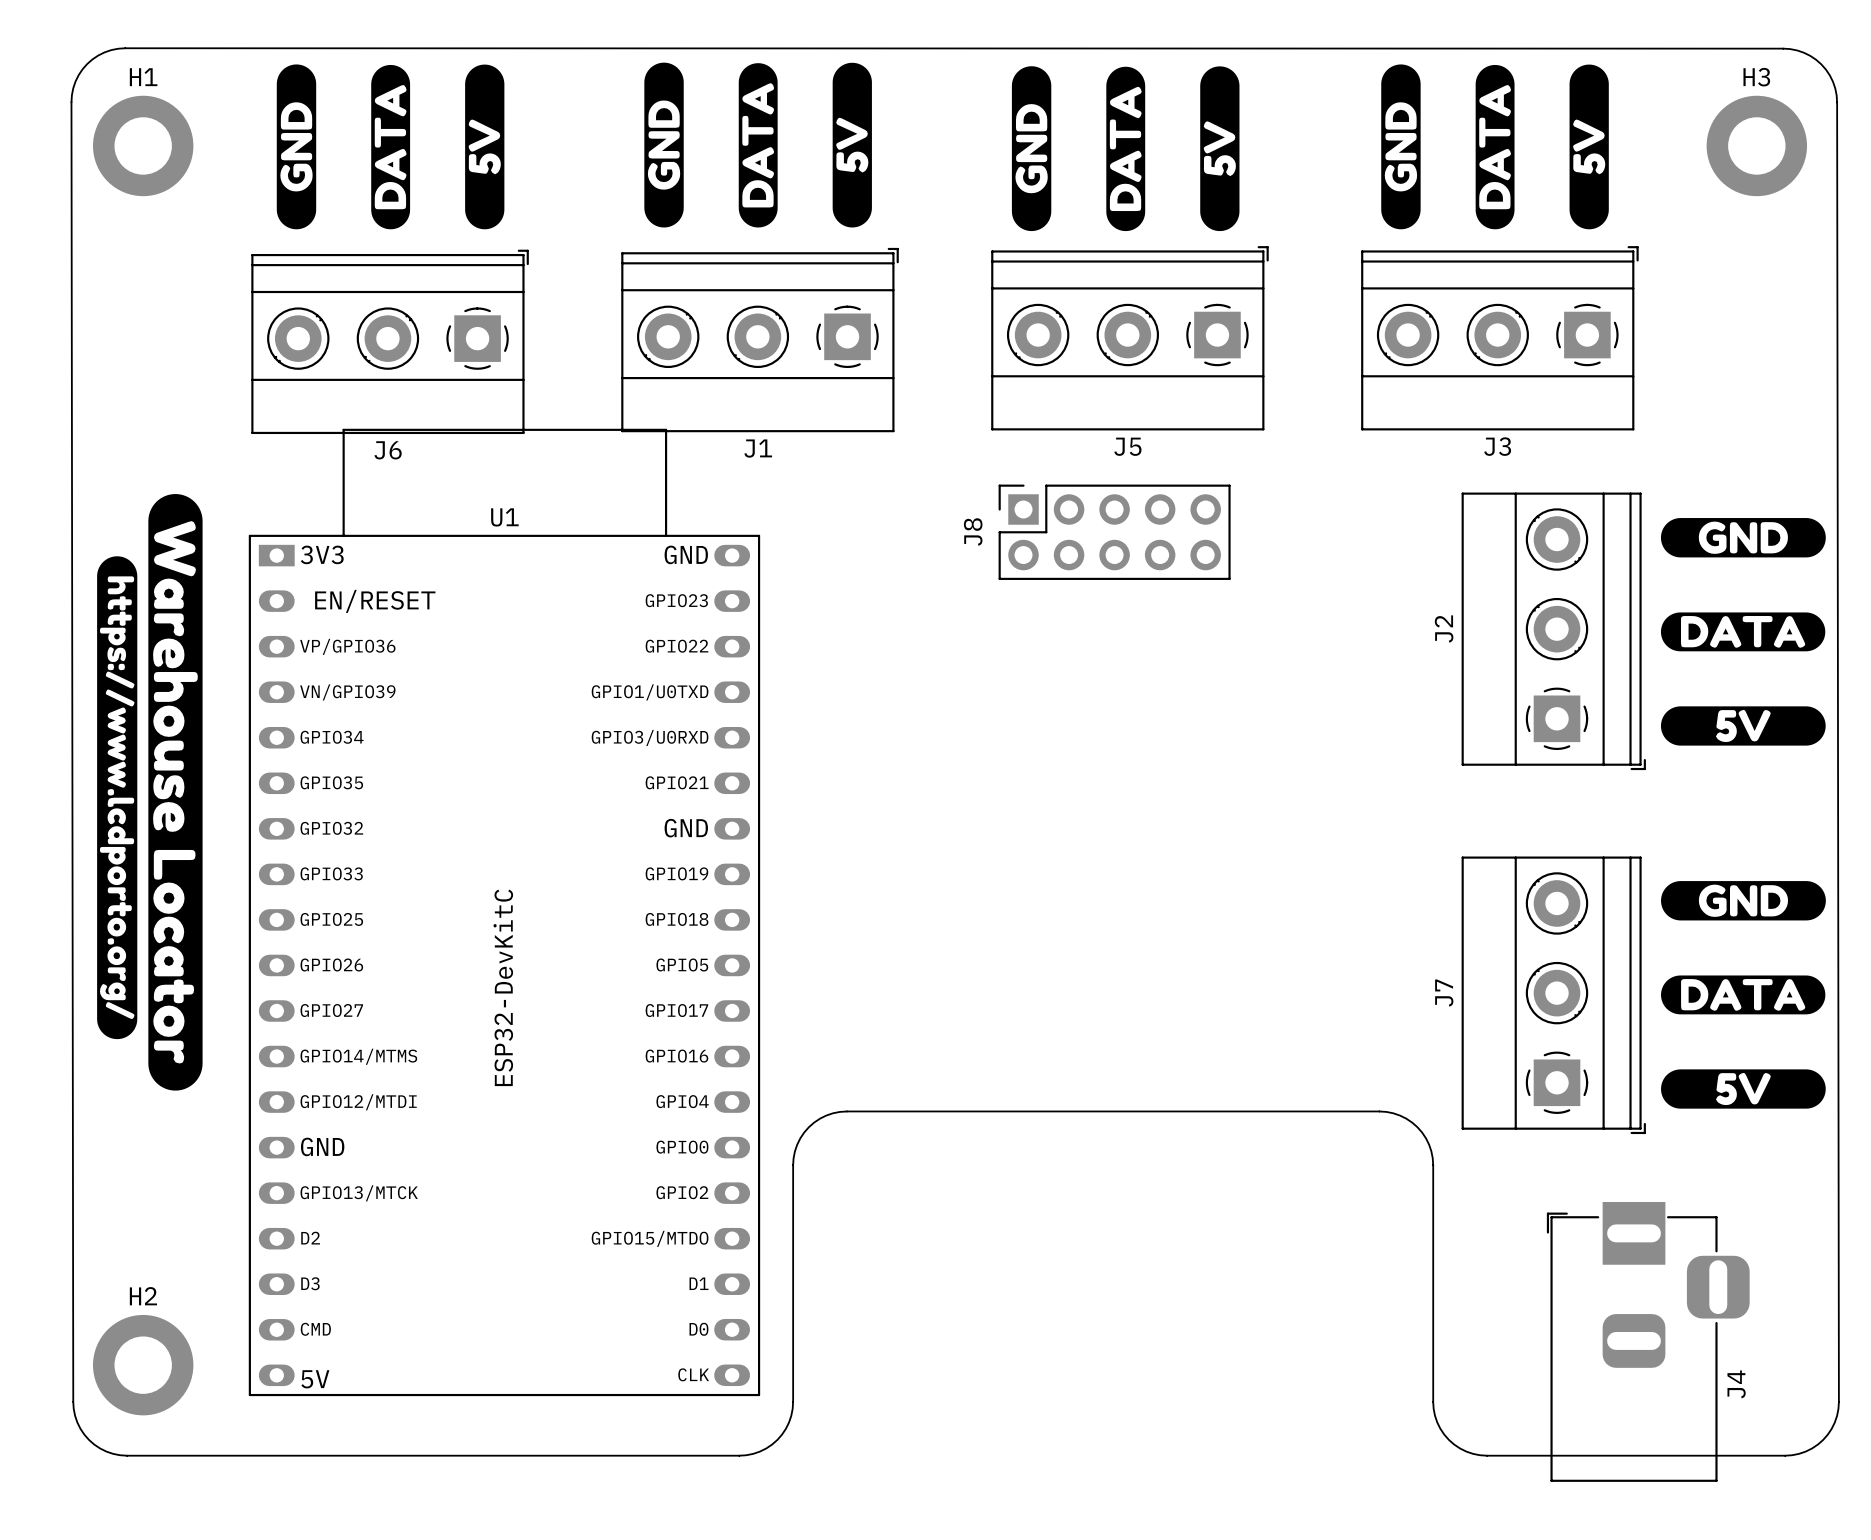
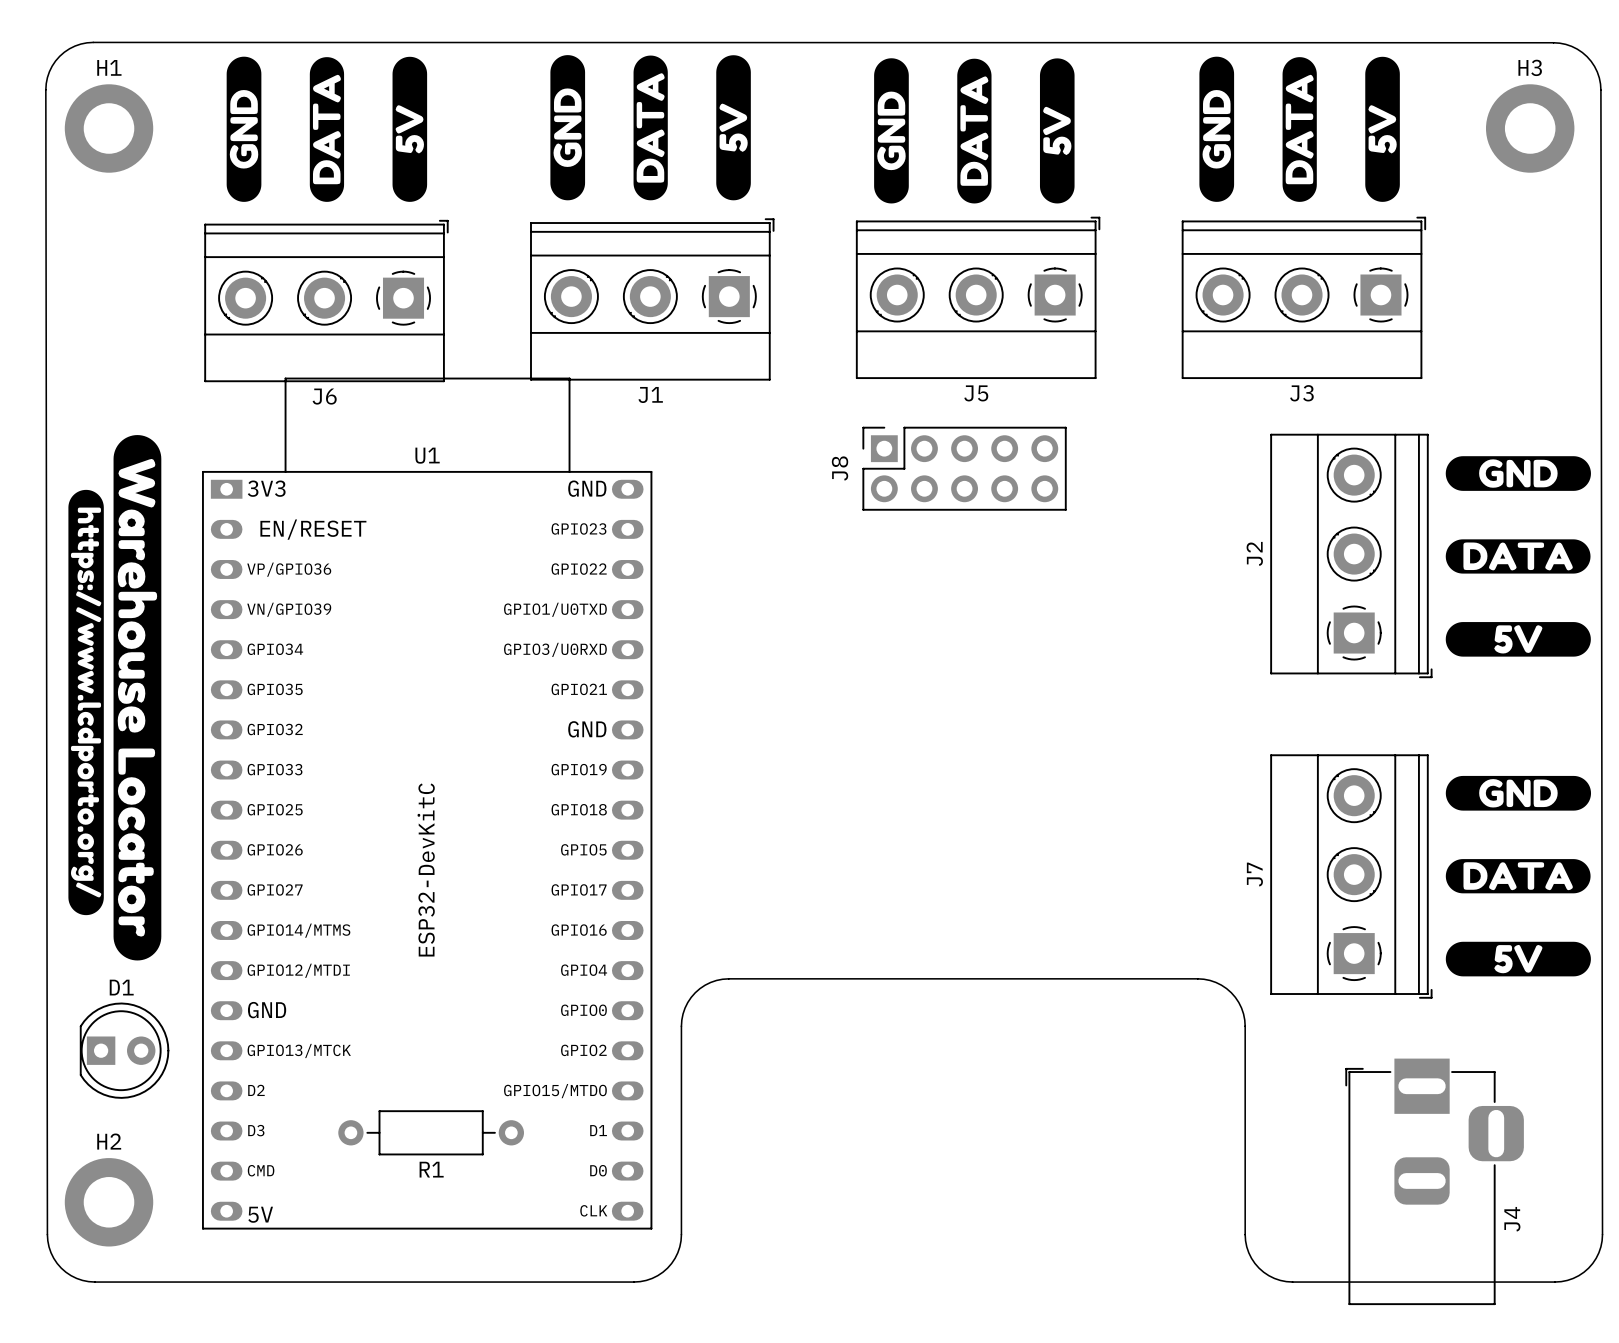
D1: none -> (124, 1050)
R1: none -> (431, 1132)

